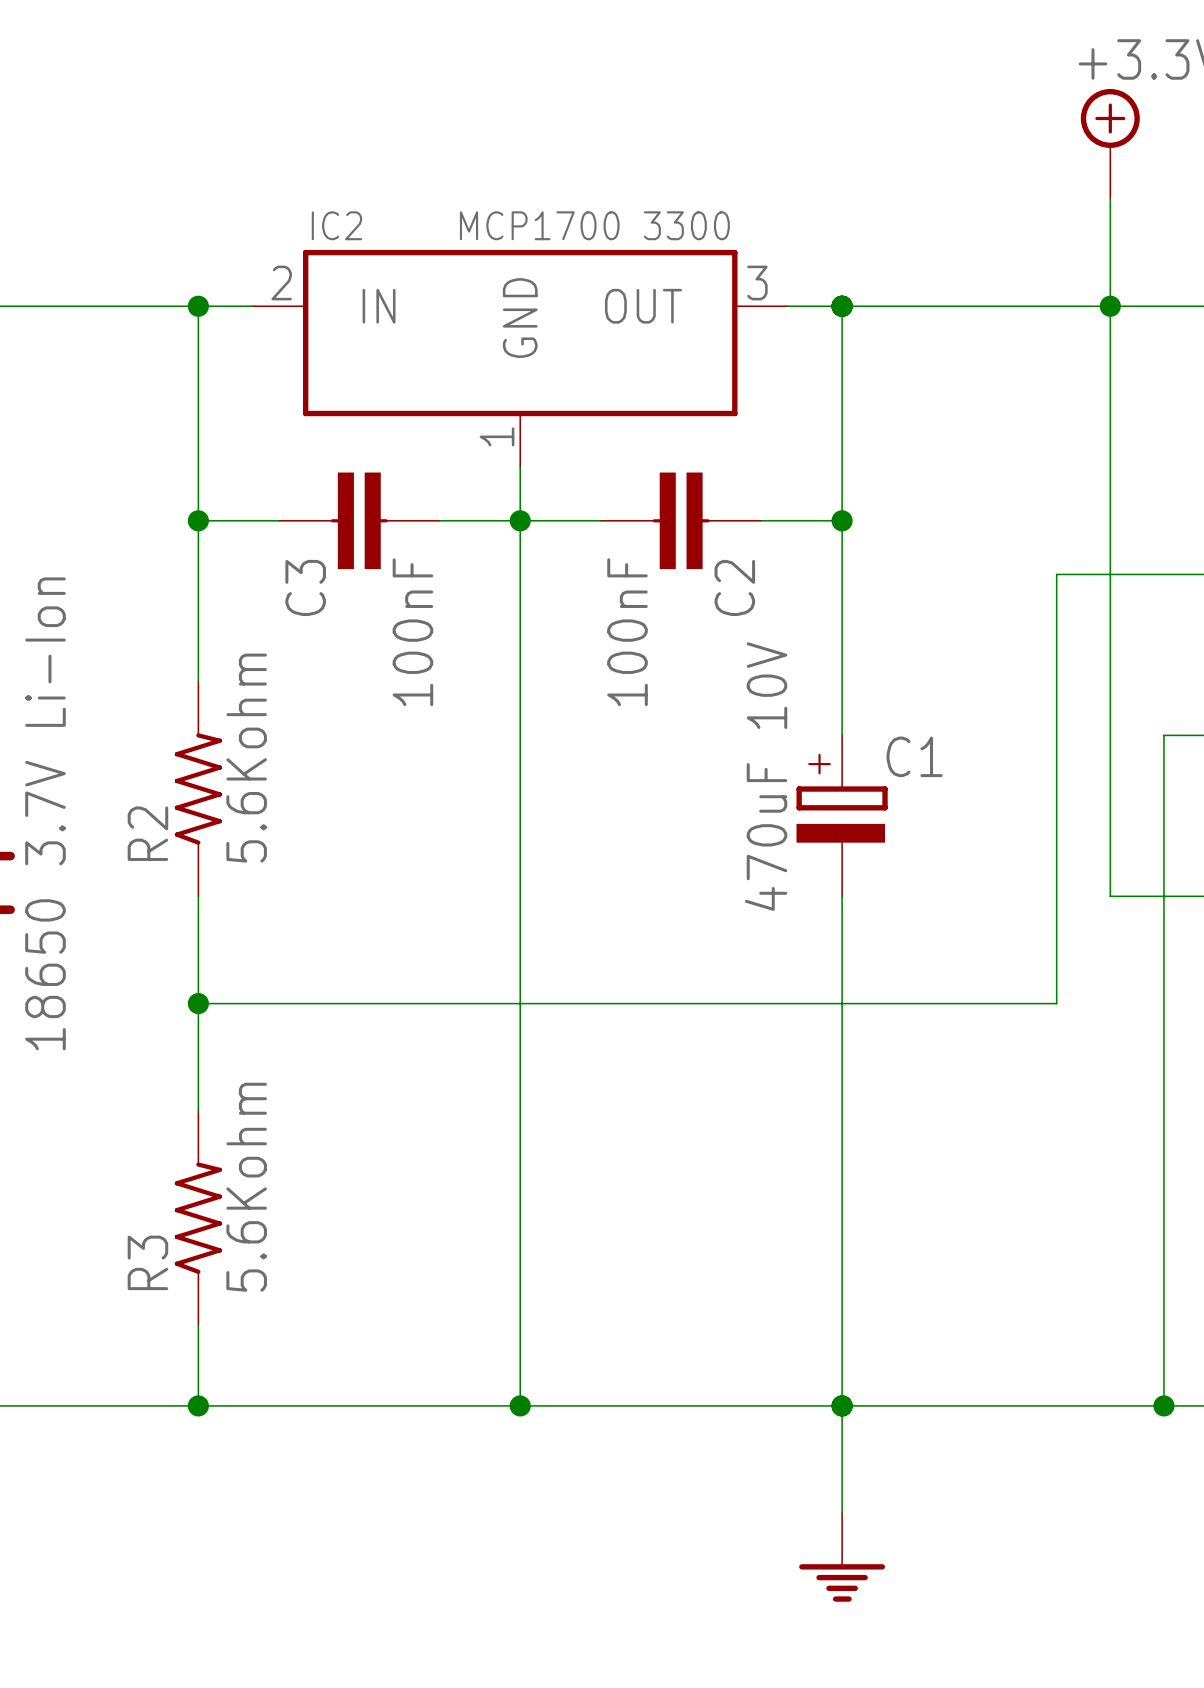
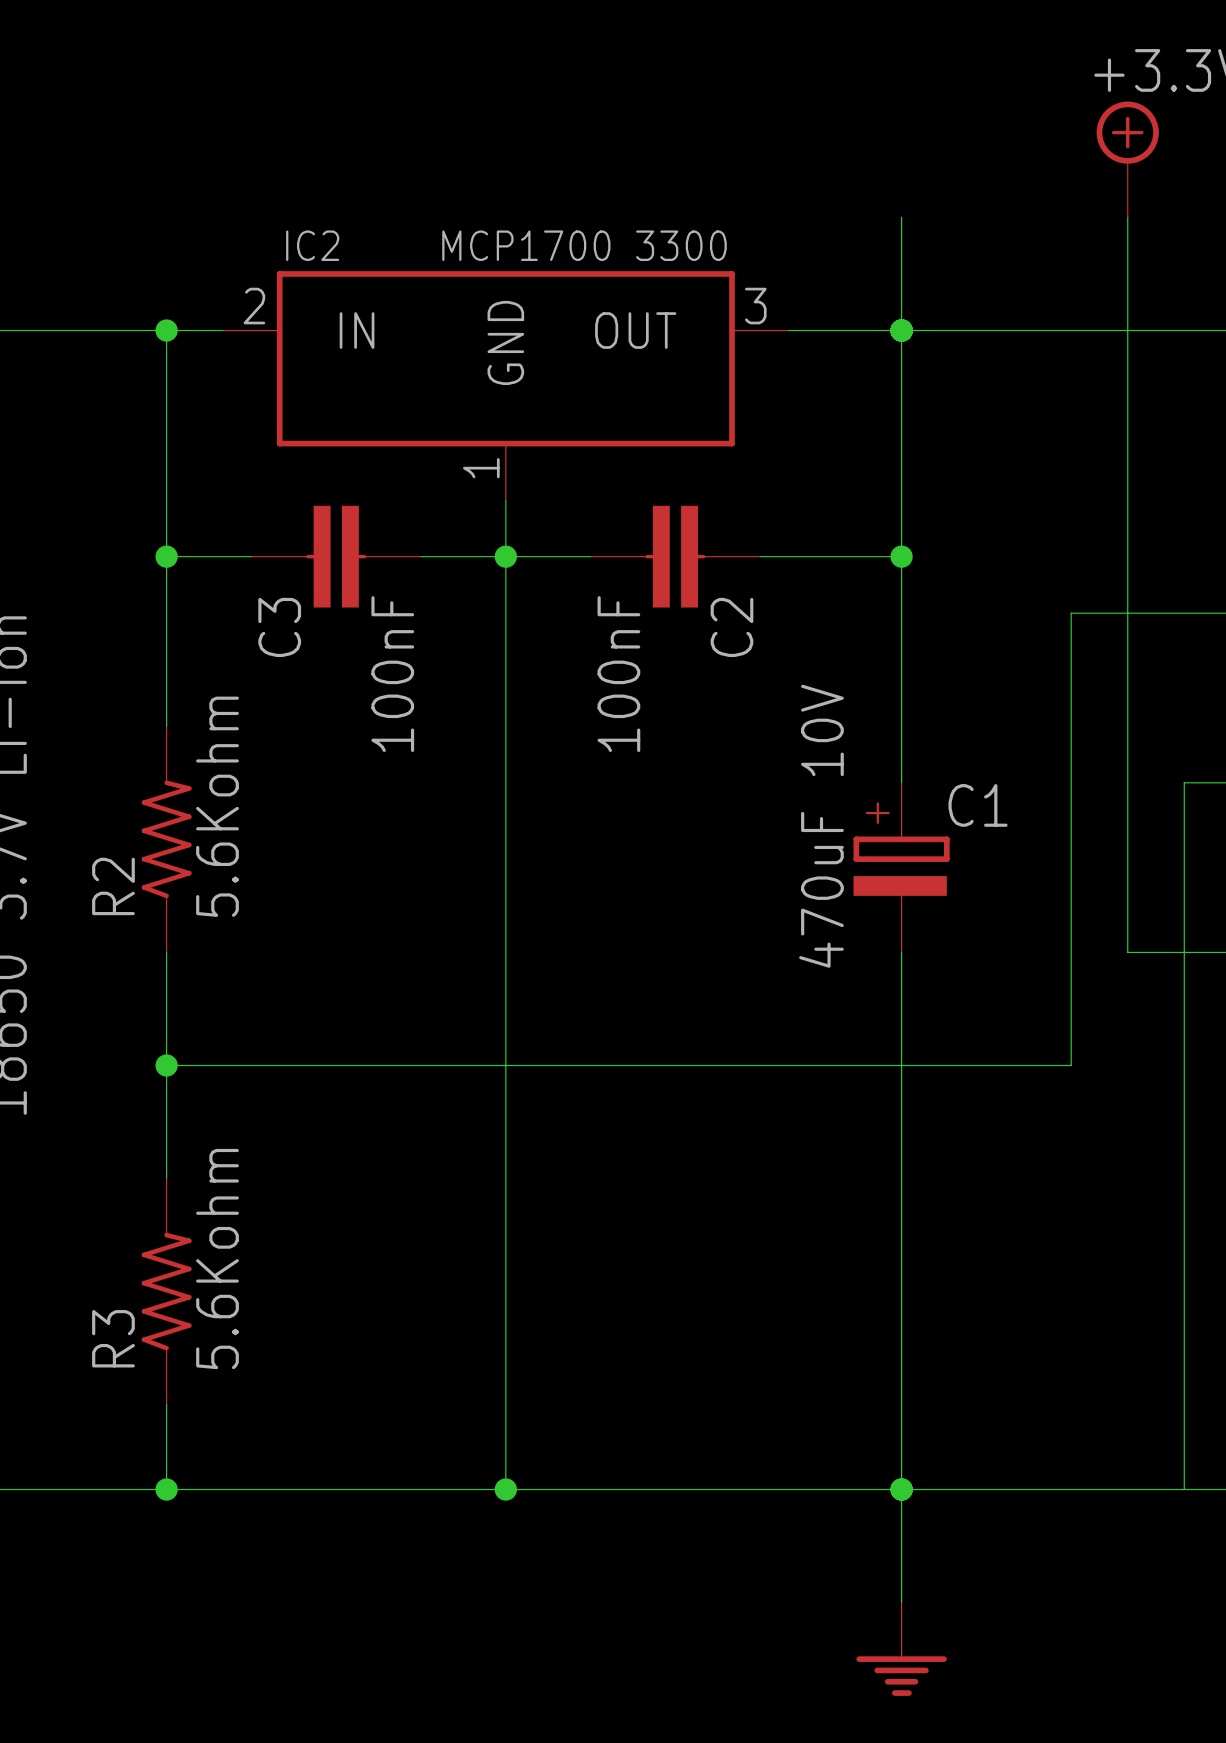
wire: none -> (901, 217) (901, 782)
wire: (842, 306) (842, 735) -> none
junction position: (842, 306) -> (901, 330)
junction: (1110, 306) -> none
wire: none -> (845, 556) (901, 556)
junction position: (842, 520) -> (901, 556)
C1 position: (842, 815) -> (901, 867)
wire: (842, 896) (842, 1513) -> (901, 952) (901, 1602)
junction position: (842, 1405) -> (901, 1489)
junction: (1163, 1405) -> none
power symbol position: (842, 1557) -> (901, 1649)

